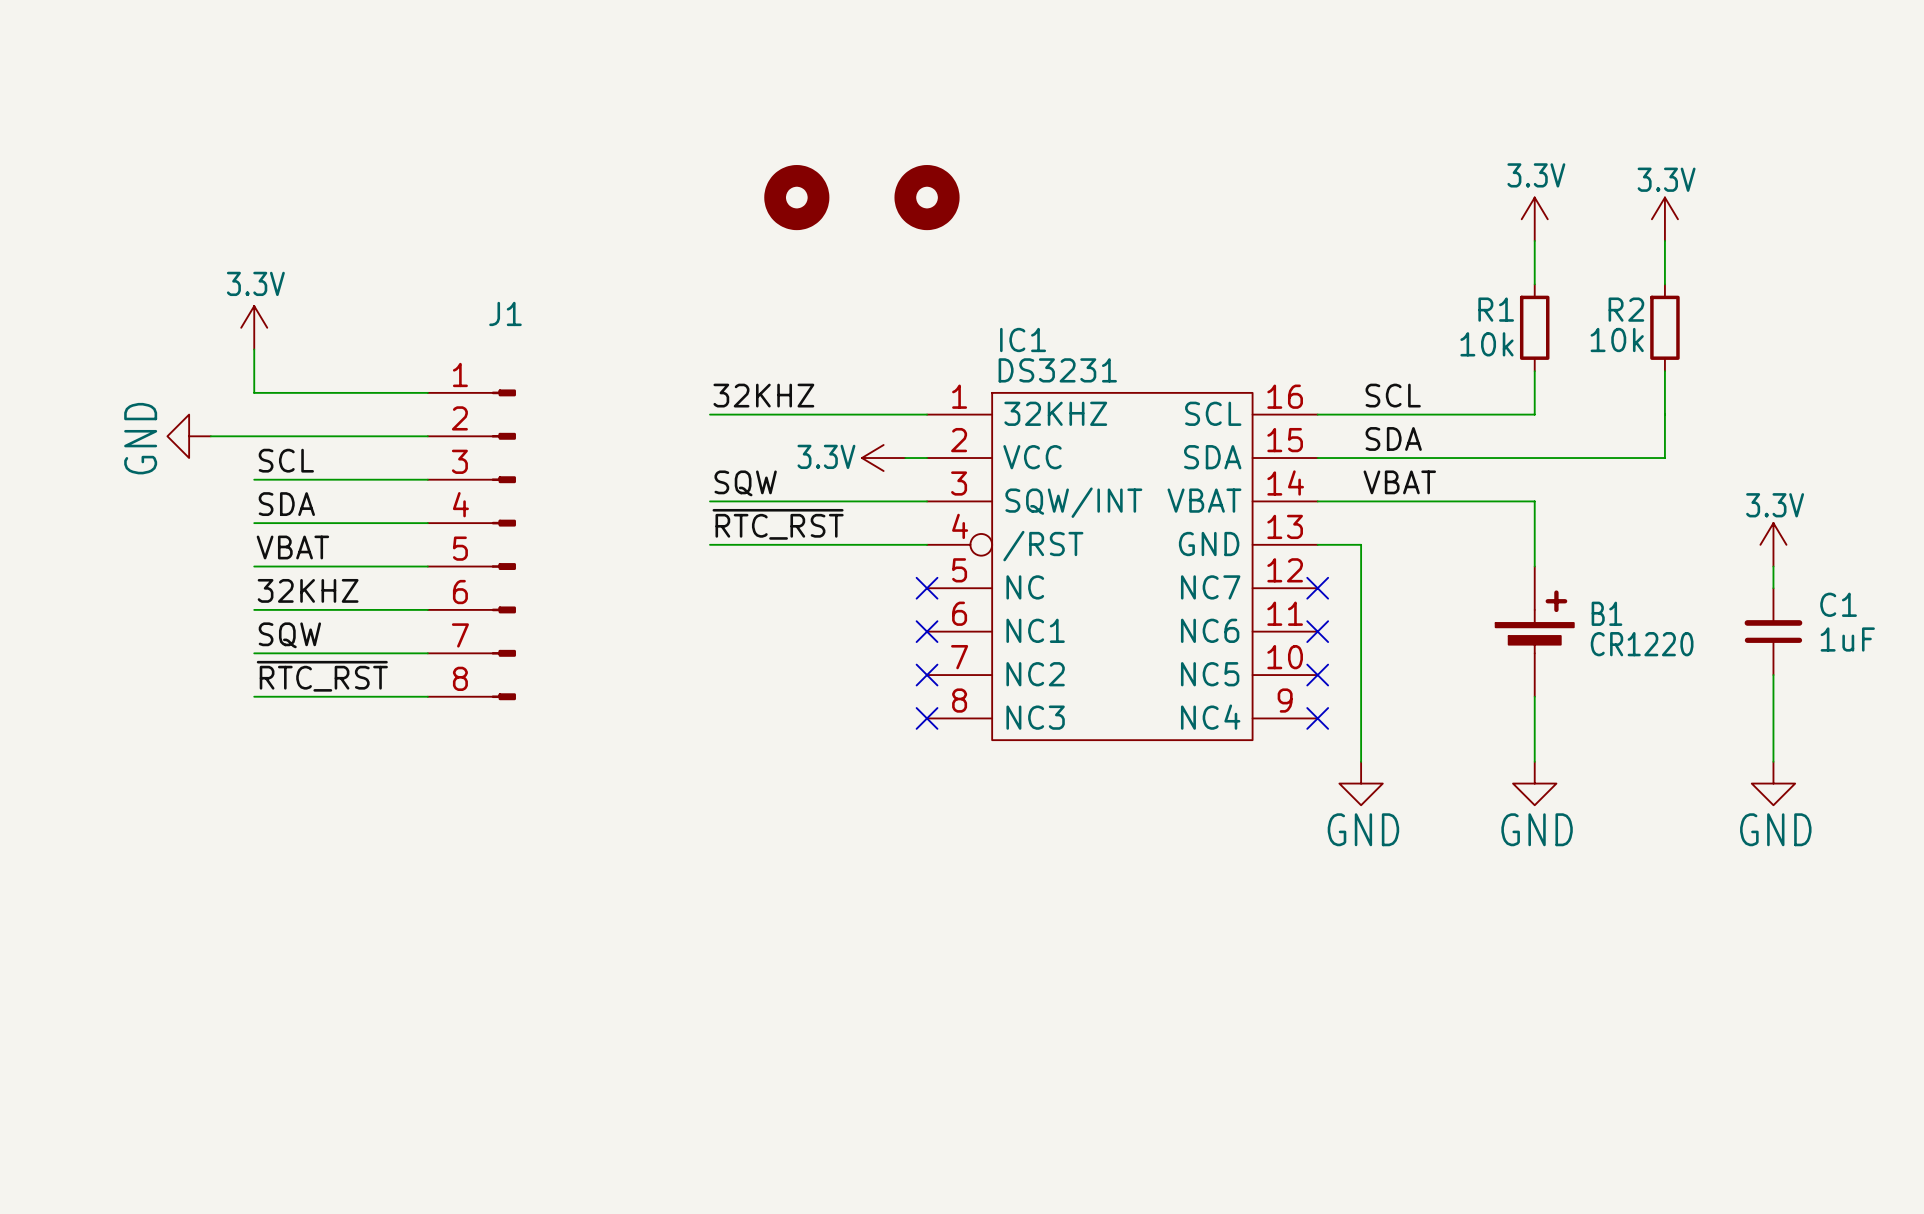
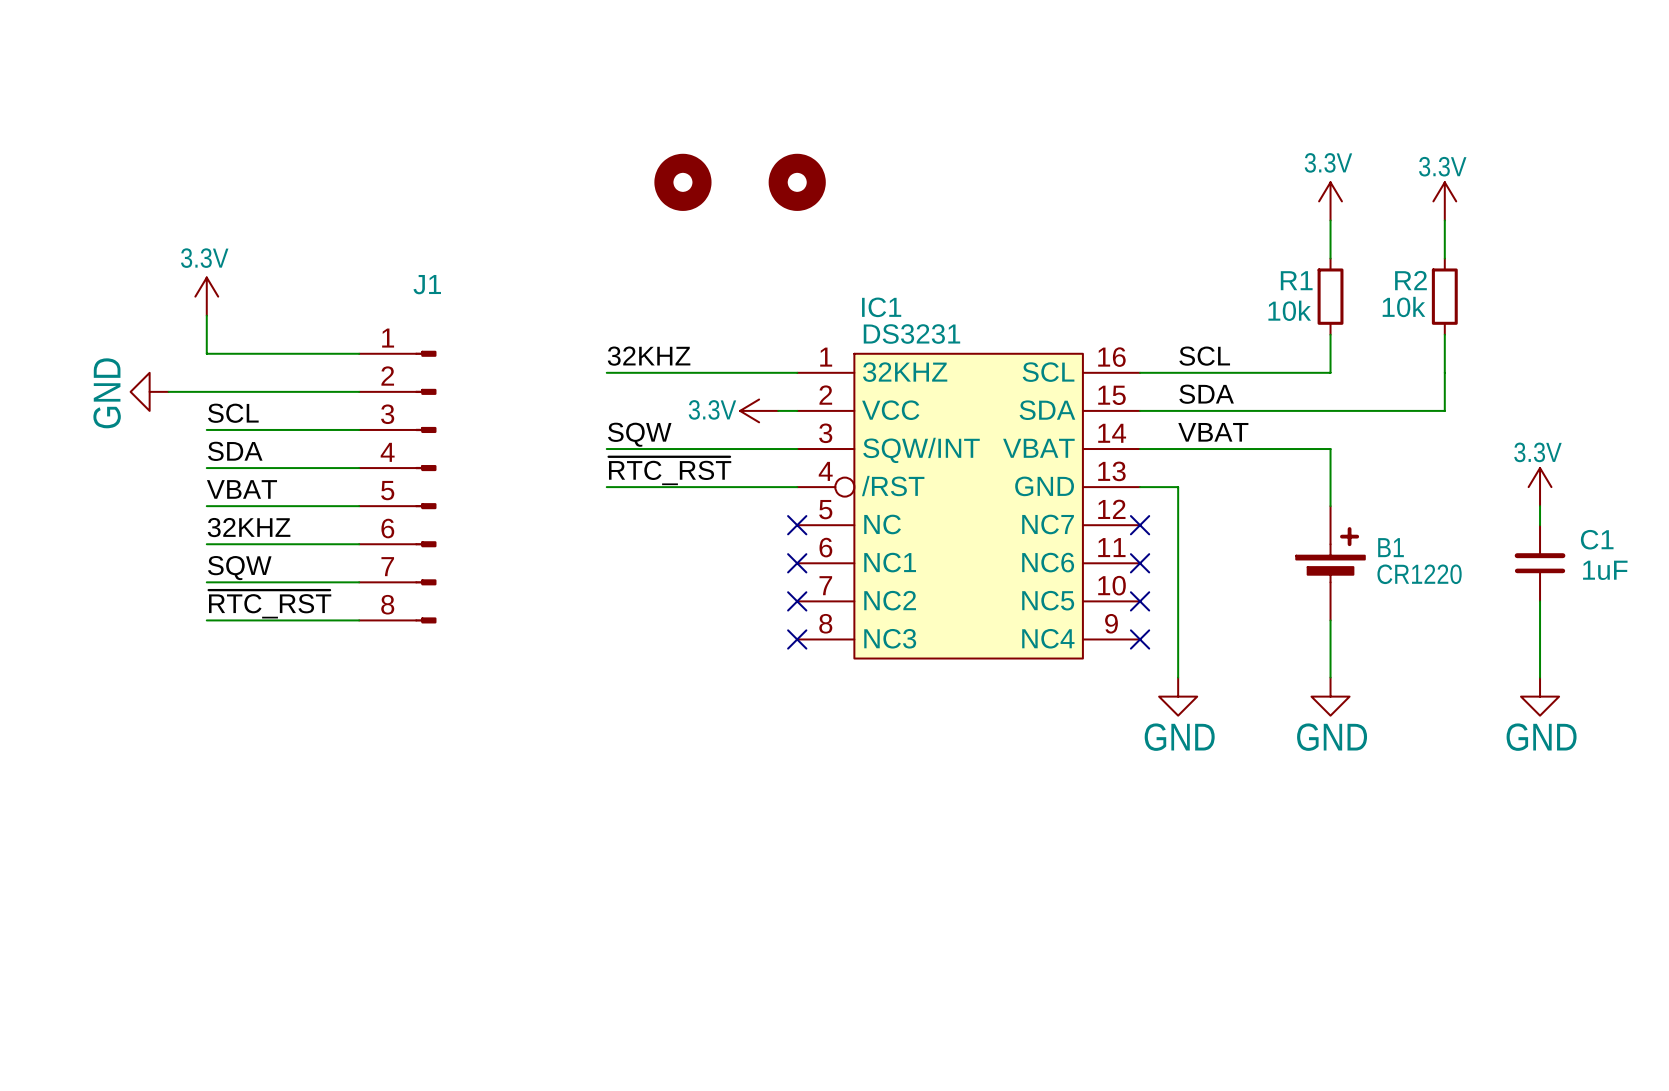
IC1 symbol: [927, 392, 1318, 741] -> [797, 353, 1141, 659]

